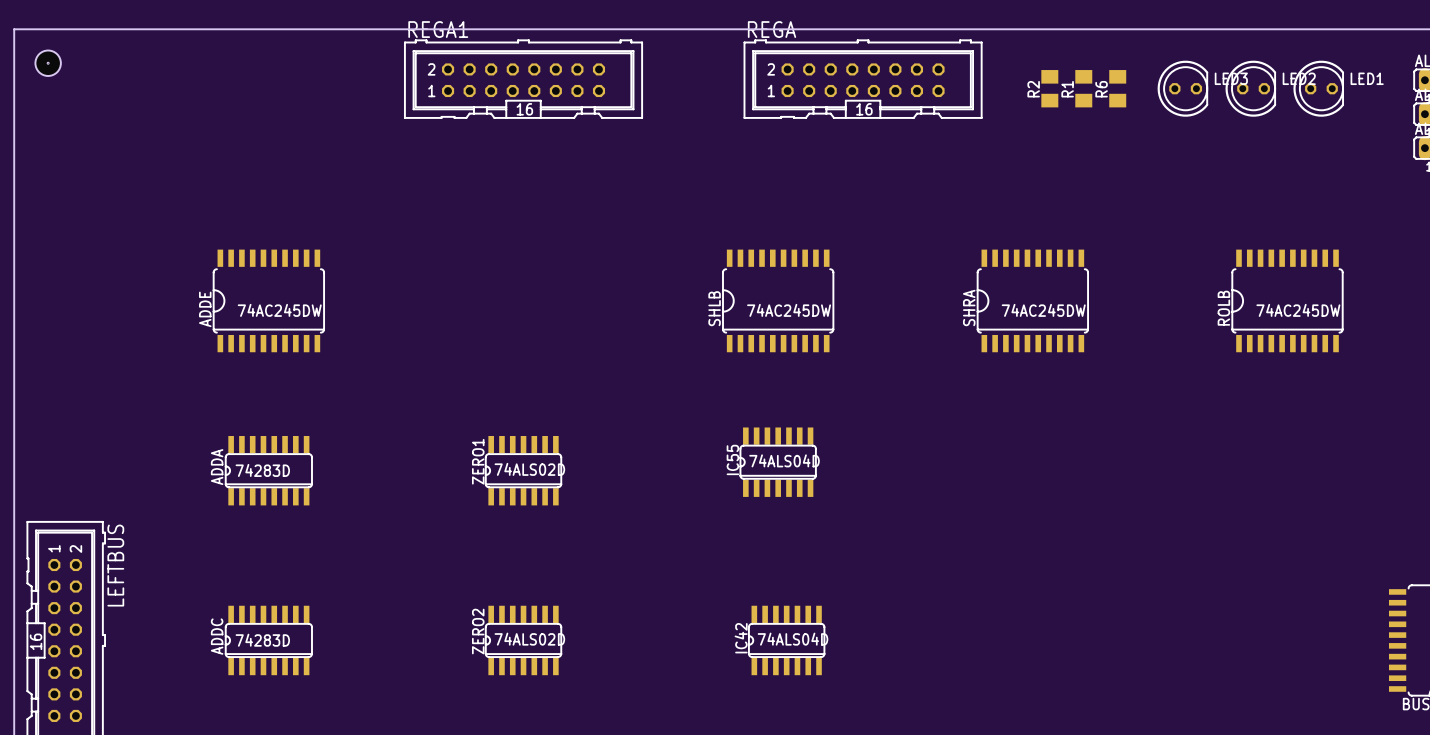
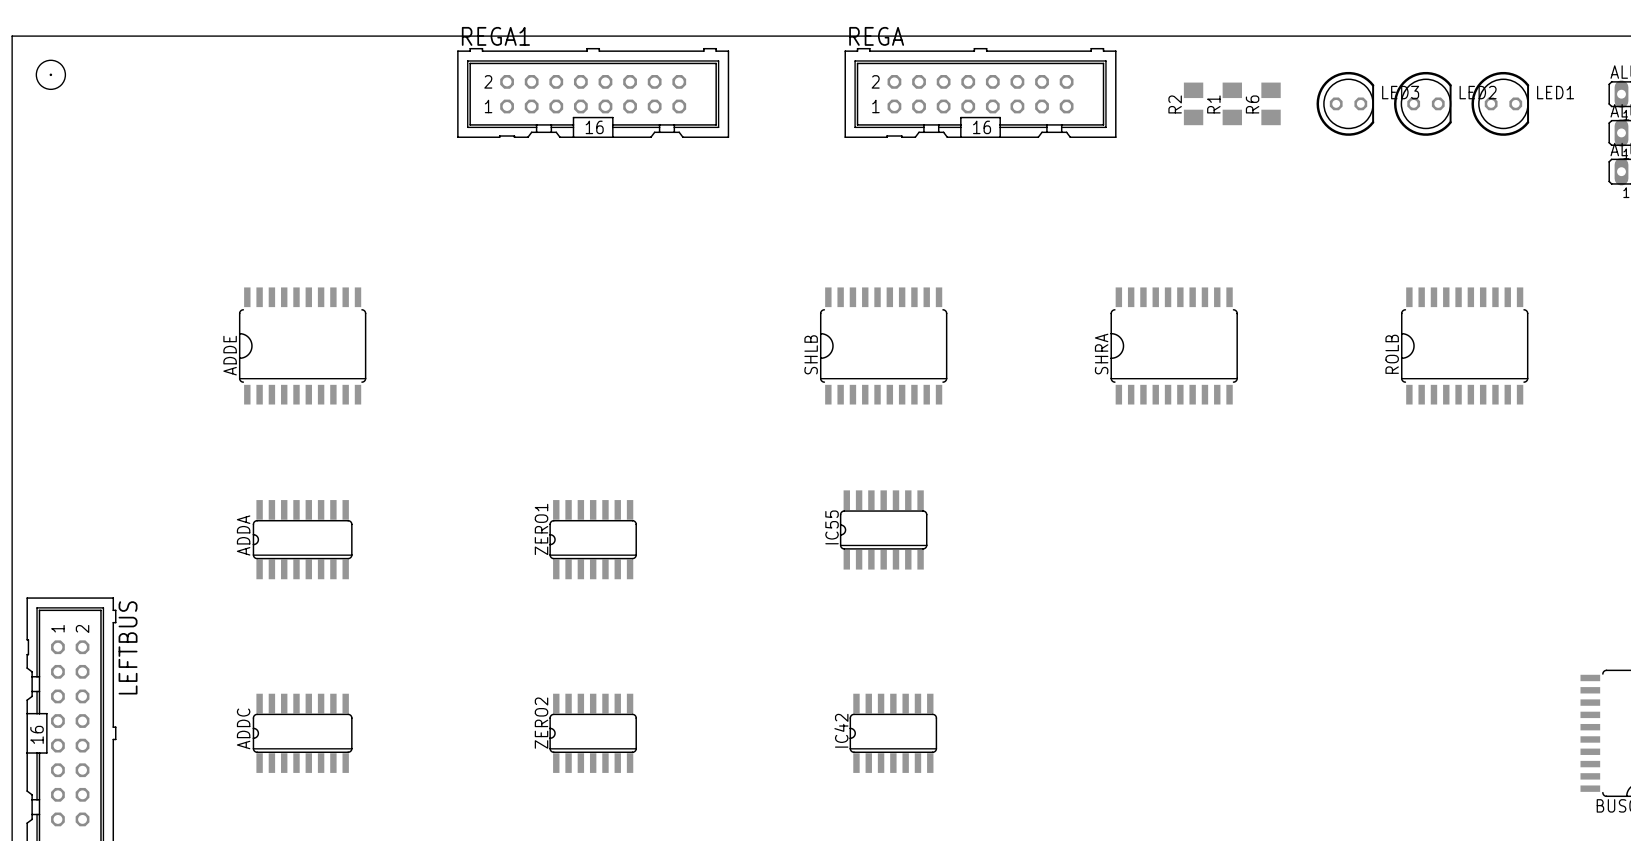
ADDE value: 74AC245DW (279, 310) -> none
SHLB value: 74AC245DW (789, 310) -> none
SHRA value: 74AC245DW (1043, 310) -> none
ROLB value: 74AC245DW (1298, 310) -> none
IC55 value: 74ALS04D (784, 460) -> none
ZERO1 value: 74ALS02D (529, 469) -> none
ADDA value: 74283D (262, 470) -> none
ZERO2 value: 74ALS02D (529, 639) -> none
IC42 value: 74ALS04D (793, 639) -> none
ADDC value: 74283D (262, 640) -> none

